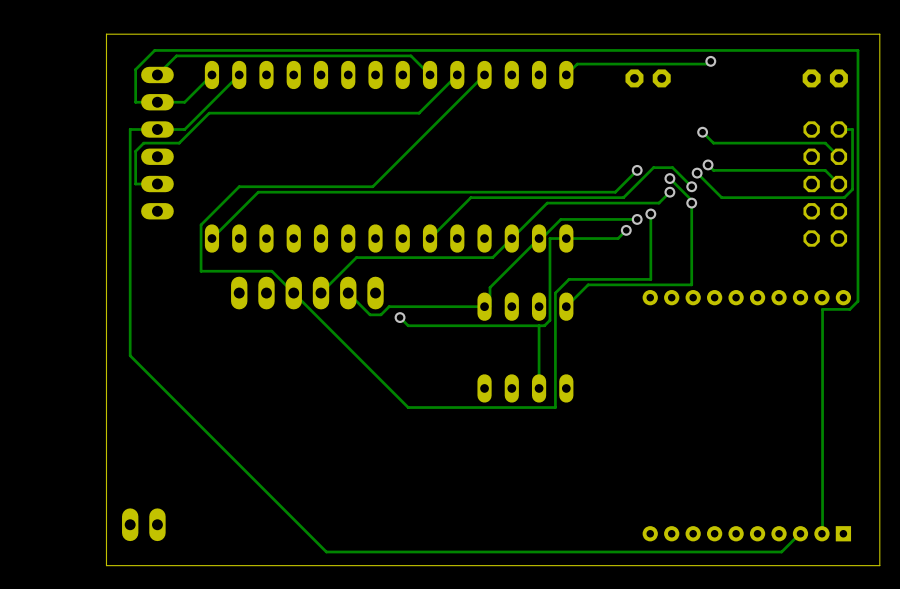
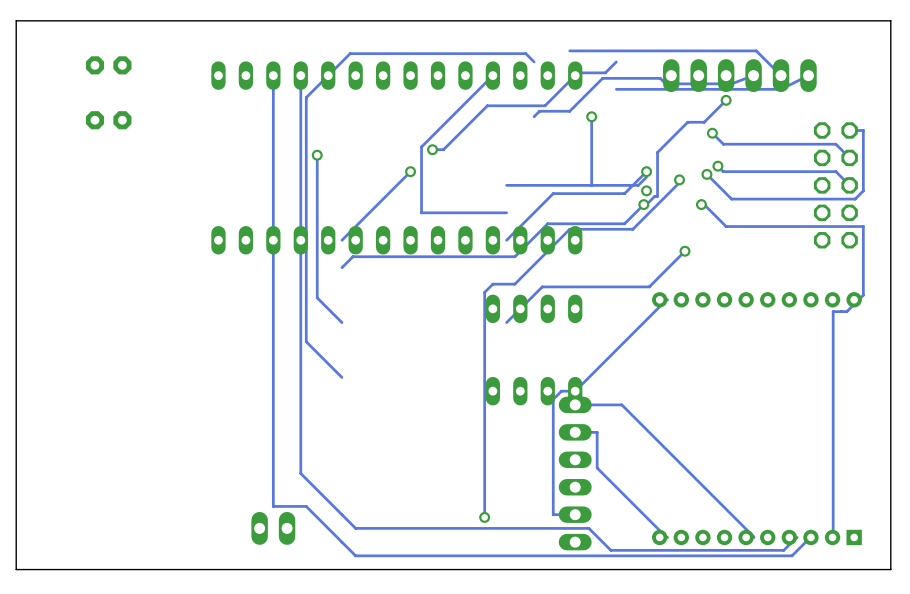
board edge: (879, 34) (106, 34) (106, 565) -> (890, 34) (890, 20) (16, 20) (16, 569) (112, 569)
track: (560, 50) (154, 50) (135, 69) (135, 102) (184, 102) (211, 74) -> none
track: (746, 50) (857, 50) (857, 301) (849, 309) (836, 309) -> (704, 204) (726, 226) (863, 226) (863, 295) (846, 311)
track: none -> (756, 50) (781, 75)
track: none -> (534, 61) (525, 53) (350, 53) (306, 97) (306, 341) (341, 377)
track: (710, 61) (708, 64) (577, 64) (569, 72) -> (616, 61) (605, 72) (577, 72)
via position: (710, 61) -> (726, 100)
part: none -> (108, 65)
track: (239, 74) (184, 129) (130, 129) (130, 355) (326, 551) (348, 551) -> (273, 75) (273, 506) (306, 506) (355, 555)
track: none -> (300, 75) (300, 473) (355, 528) (588, 528) (610, 550) (783, 550) (797, 537)
track: (430, 74) (410, 55) (176, 55) (157, 74) -> none
track: (457, 74) (419, 113) (209, 113) (179, 143) (143, 143) (135, 151) (135, 184) (157, 184) -> none
track: none -> (575, 75) (545, 105) (487, 105) (443, 149) (432, 149)
part: none -> (739, 75)
track: none -> (753, 75) (731, 83) (665, 83) (660, 78) (602, 78) (569, 111) (539, 111) (534, 116)
track: none -> (808, 75) (781, 89) (616, 89)
part: (648, 78) -> none
part: (825, 78) -> none
track: none -> (591, 116) (591, 185)
via: none -> (591, 116)
part: none -> (108, 120)
part: (157, 143) -> none
track: (413, 145) (372, 186) (239, 186) (201, 224) (201, 271) (271, 271) (408, 407) (555, 407) (555, 293) (569, 279) (650, 279) (650, 213) -> (421, 146) (421, 212) (506, 212)
via: none -> (432, 149)
track: none -> (317, 155) (317, 297) (341, 322)
via: none -> (317, 155)
track: none -> (410, 171) (341, 240)
via: none -> (410, 171)
track: none -> (646, 177) (638, 185) (506, 185)
track: (669, 178) (691, 200) (691, 284) (639, 284) -> (684, 251) (649, 286)
track: none -> (679, 182) (632, 229) (569, 229) (514, 284) (492, 284) (484, 292) (484, 517)
track: (691, 186) (672, 167) (653, 167) (623, 197) (470, 197) (430, 238) -> none
via: (691, 186) -> none
via: none -> (646, 190)
track: (544, 192) (258, 192) (211, 238) -> (553, 193) (506, 240)
track: (669, 192) (659, 203) (637, 203) -> (726, 100) (704, 122) (687, 122) (657, 152) (657, 196) (654, 196) (646, 204)
via: (669, 192) -> none
track: (634, 203) (547, 203) (492, 257) (356, 257) (321, 293) -> (643, 204) (624, 223) (547, 223) (514, 256) (352, 256) (341, 267)
via: none -> (643, 204)
via: (650, 213) -> none
track: (637, 219) (560, 219) (490, 287) (490, 306) (389, 306) (380, 314) (370, 314) (350, 295) (350, 293) (348, 293) -> none
via: (637, 219) -> none
track: (626, 230) (618, 238) (549, 238) (549, 320) (544, 325) (408, 325) (400, 317) -> none
via: (626, 230) -> none
via: none -> (684, 251)
track: (588, 284) (566, 306) -> (597, 286) (542, 286) (506, 322)
part: (307, 293) -> none
track: none -> (667, 299) (575, 391) (561, 391) (553, 399) (553, 514) (575, 514)
via: (400, 317) -> none
track: (539, 325) (539, 388) -> none
track: none -> (575, 404) (621, 404) (754, 537)
track: none -> (575, 432) (597, 432) (597, 468) (667, 537)
part: none -> (575, 473)
via: none -> (484, 517)
part position: (143, 524) -> (273, 528)

